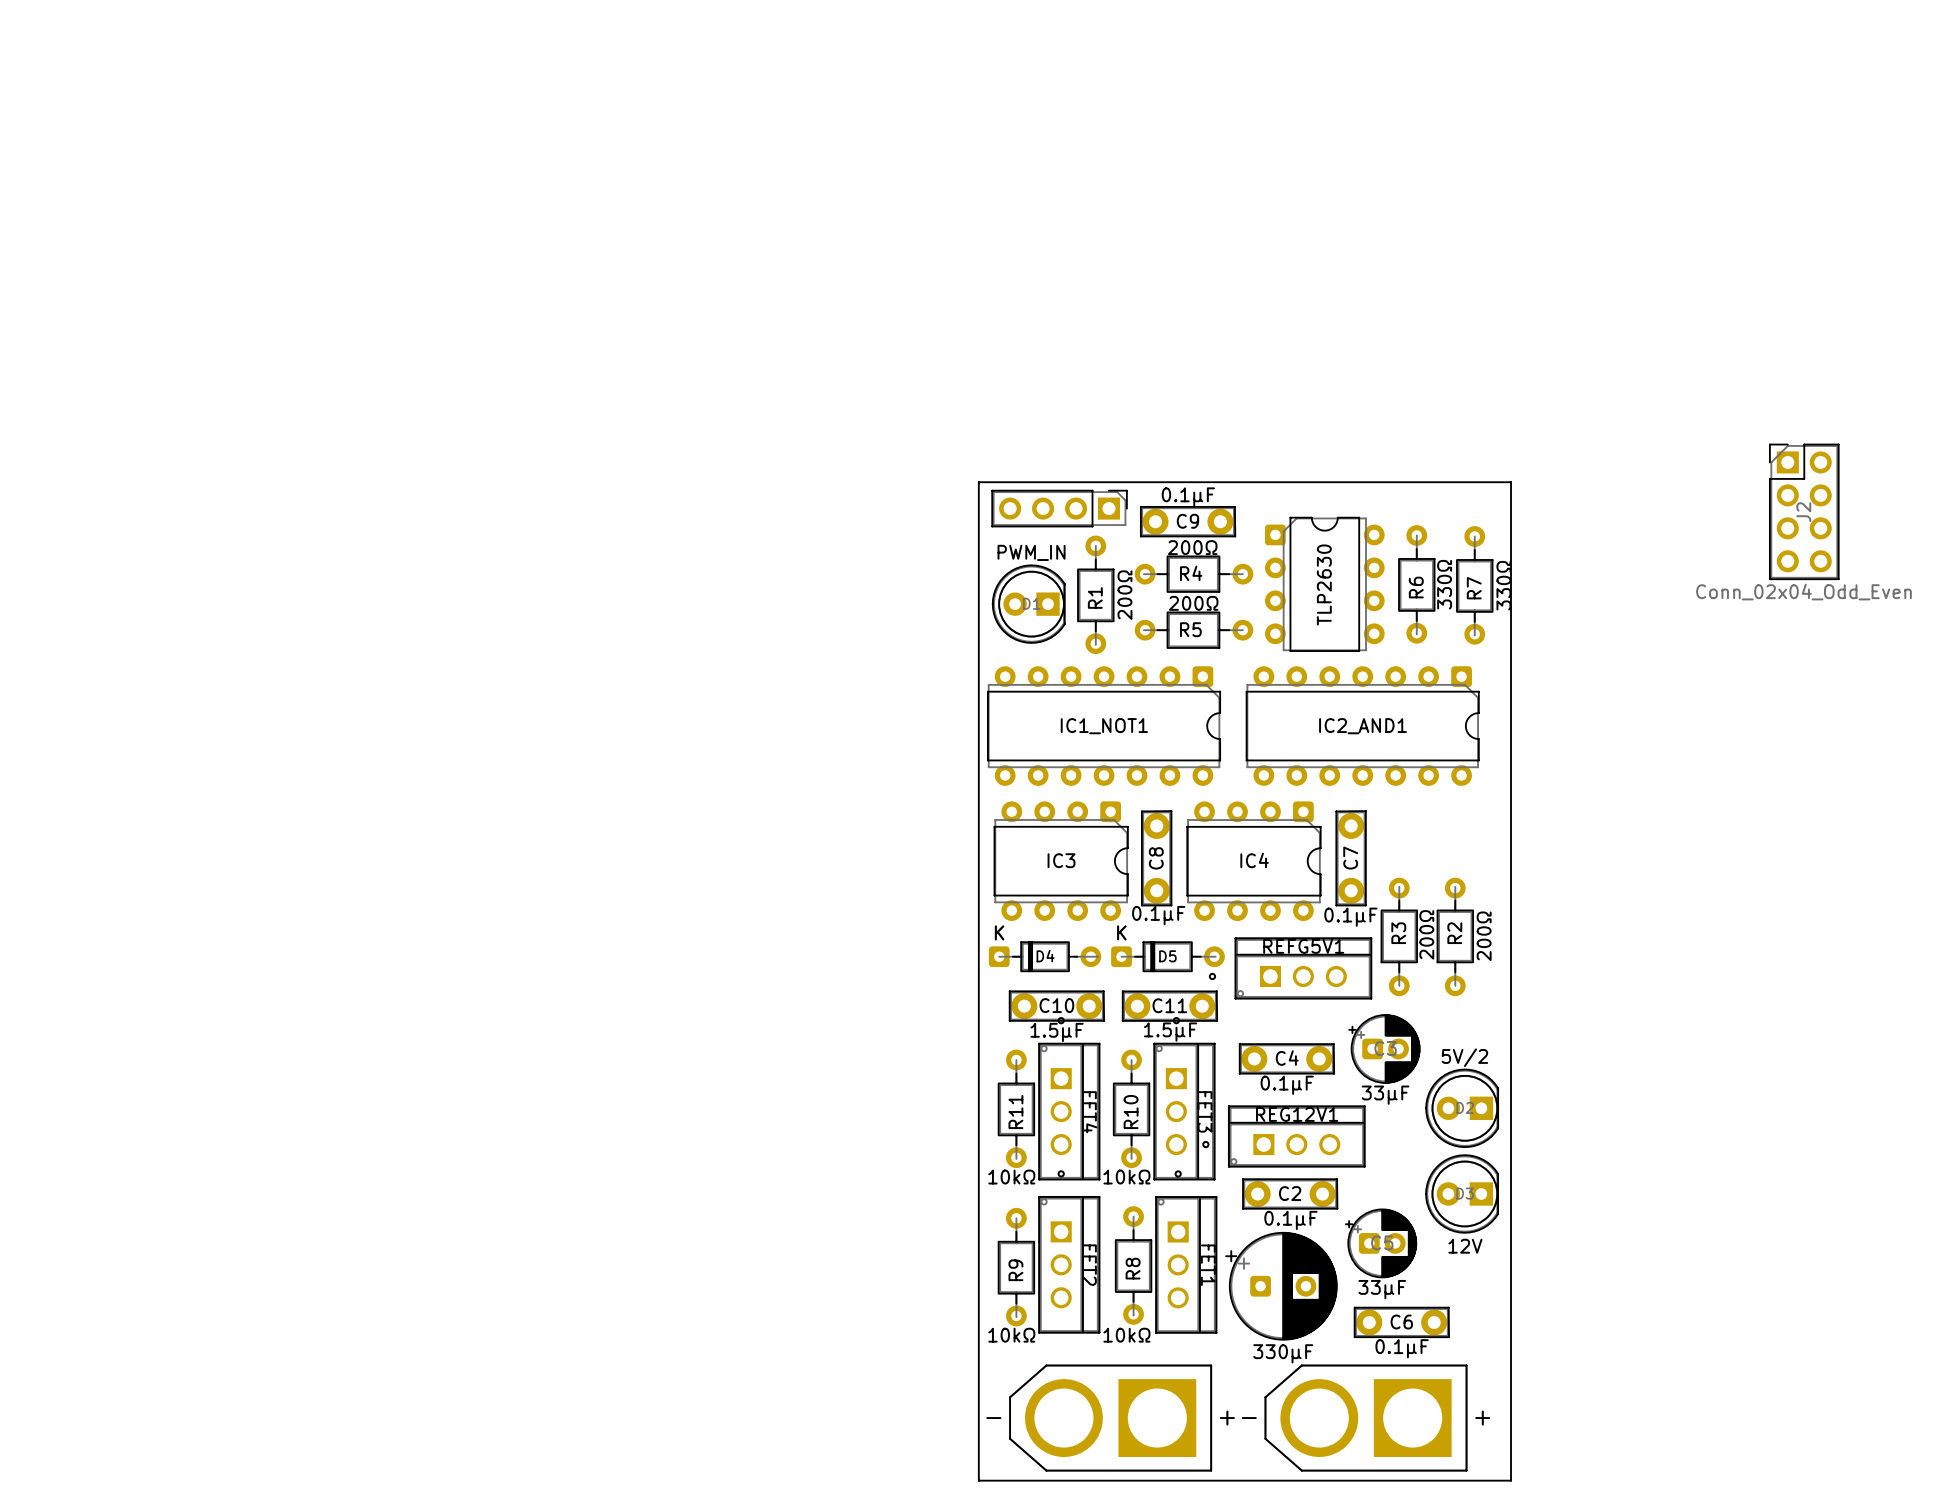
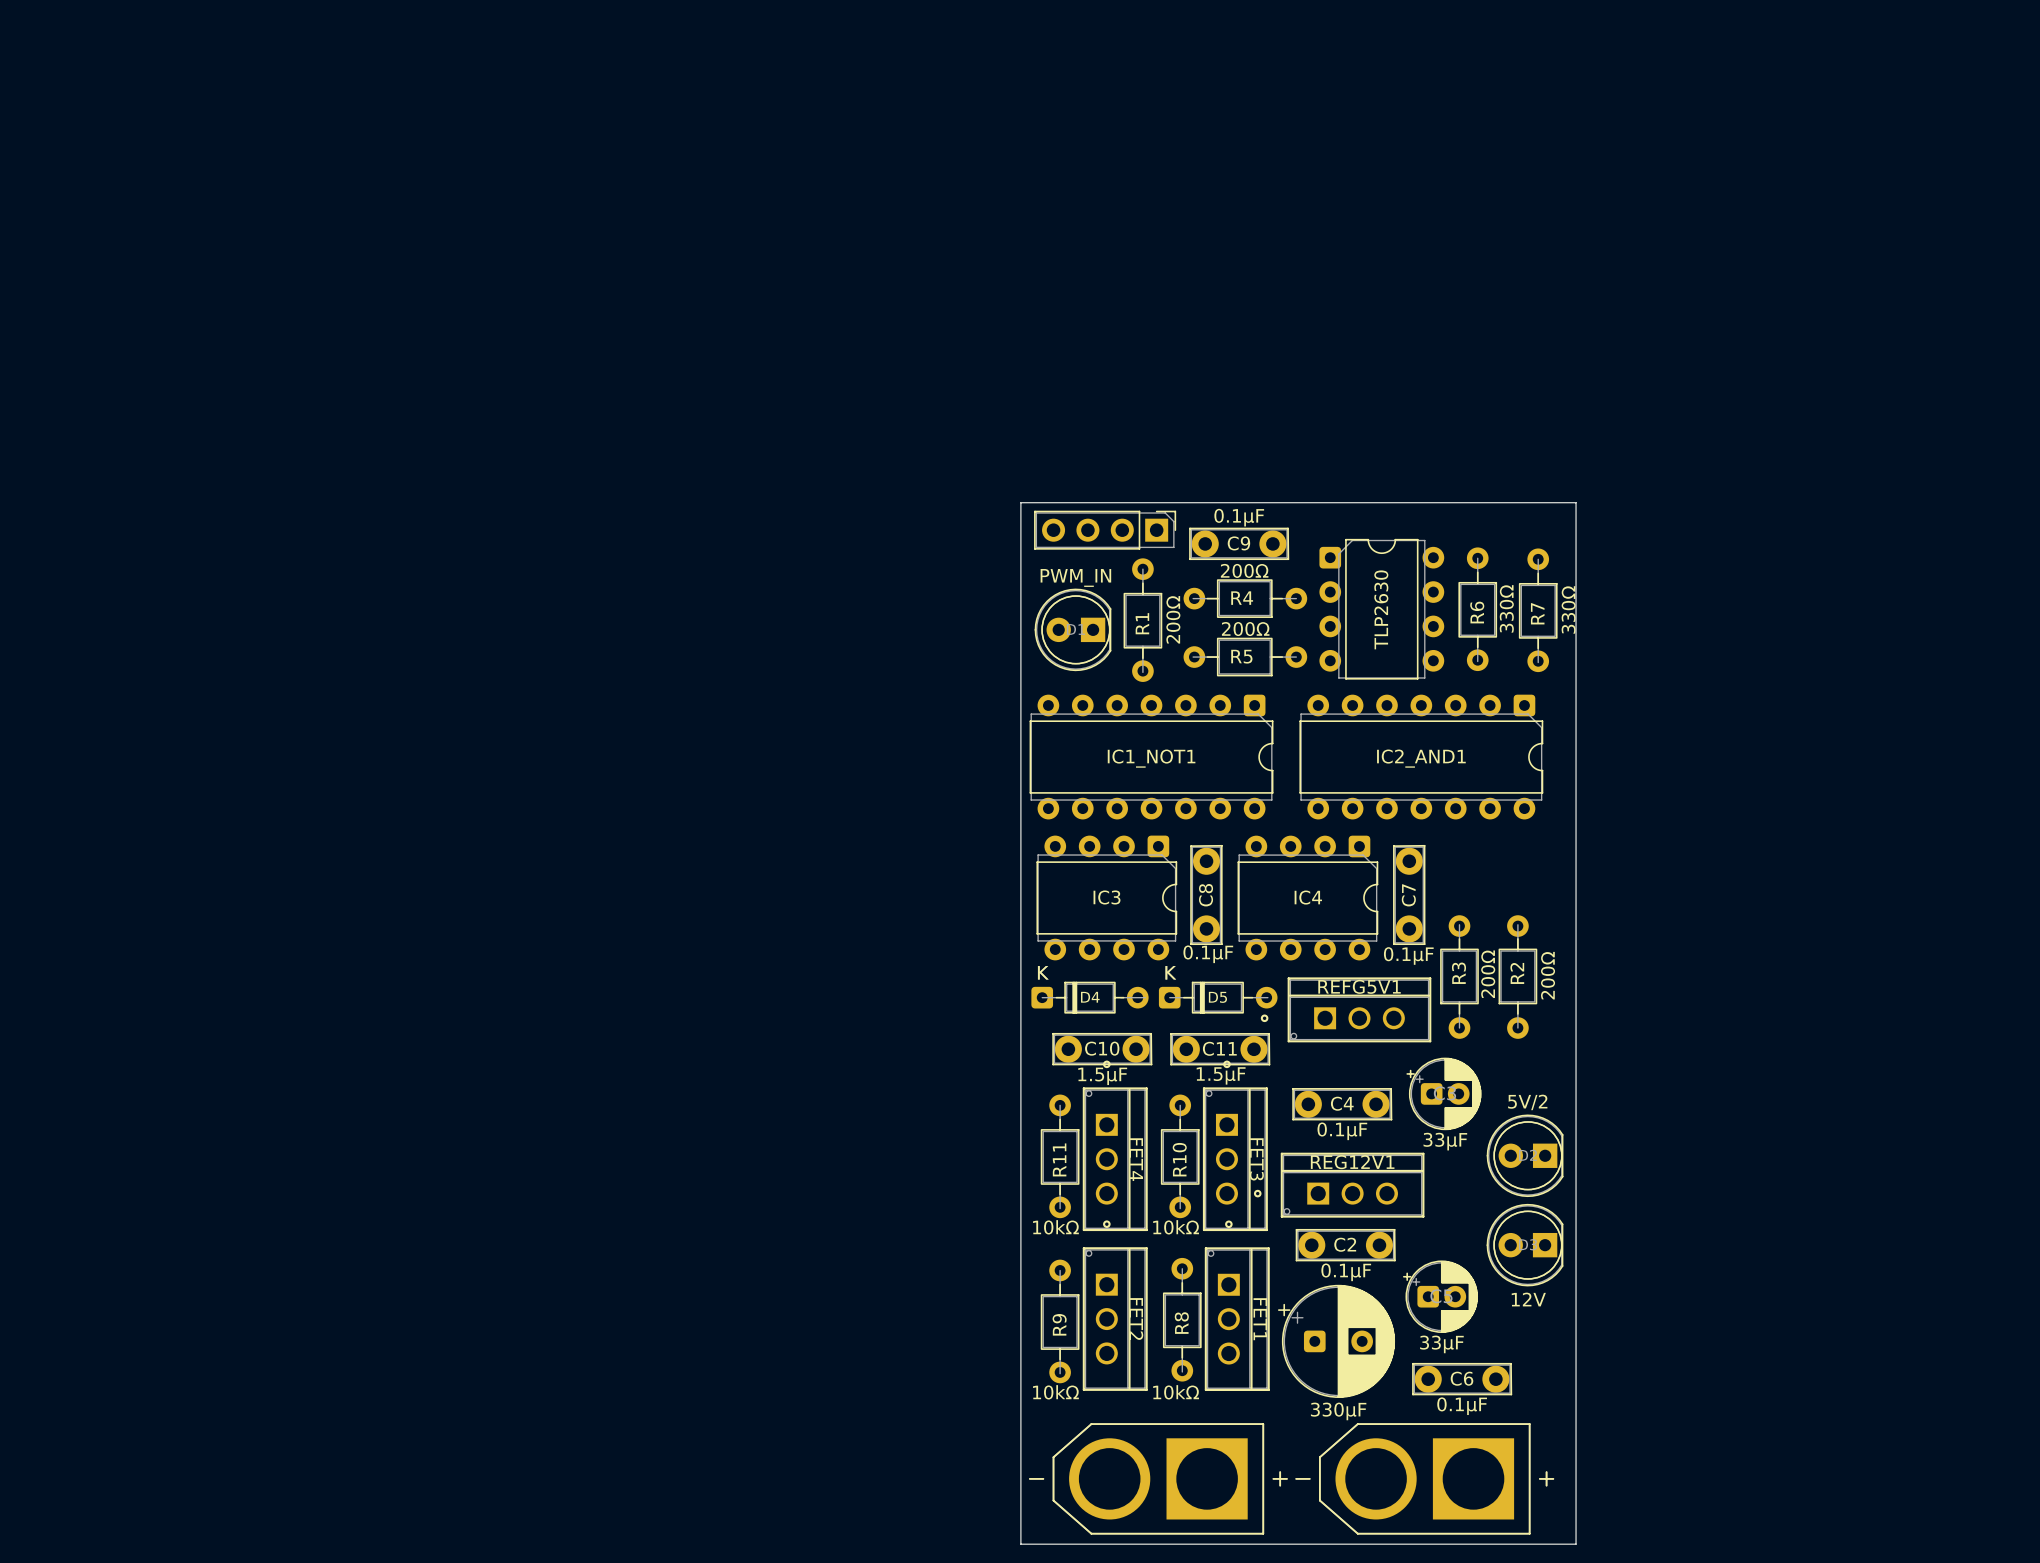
J2: Conn_02x04_Odd_Even (1804, 511) -> none

